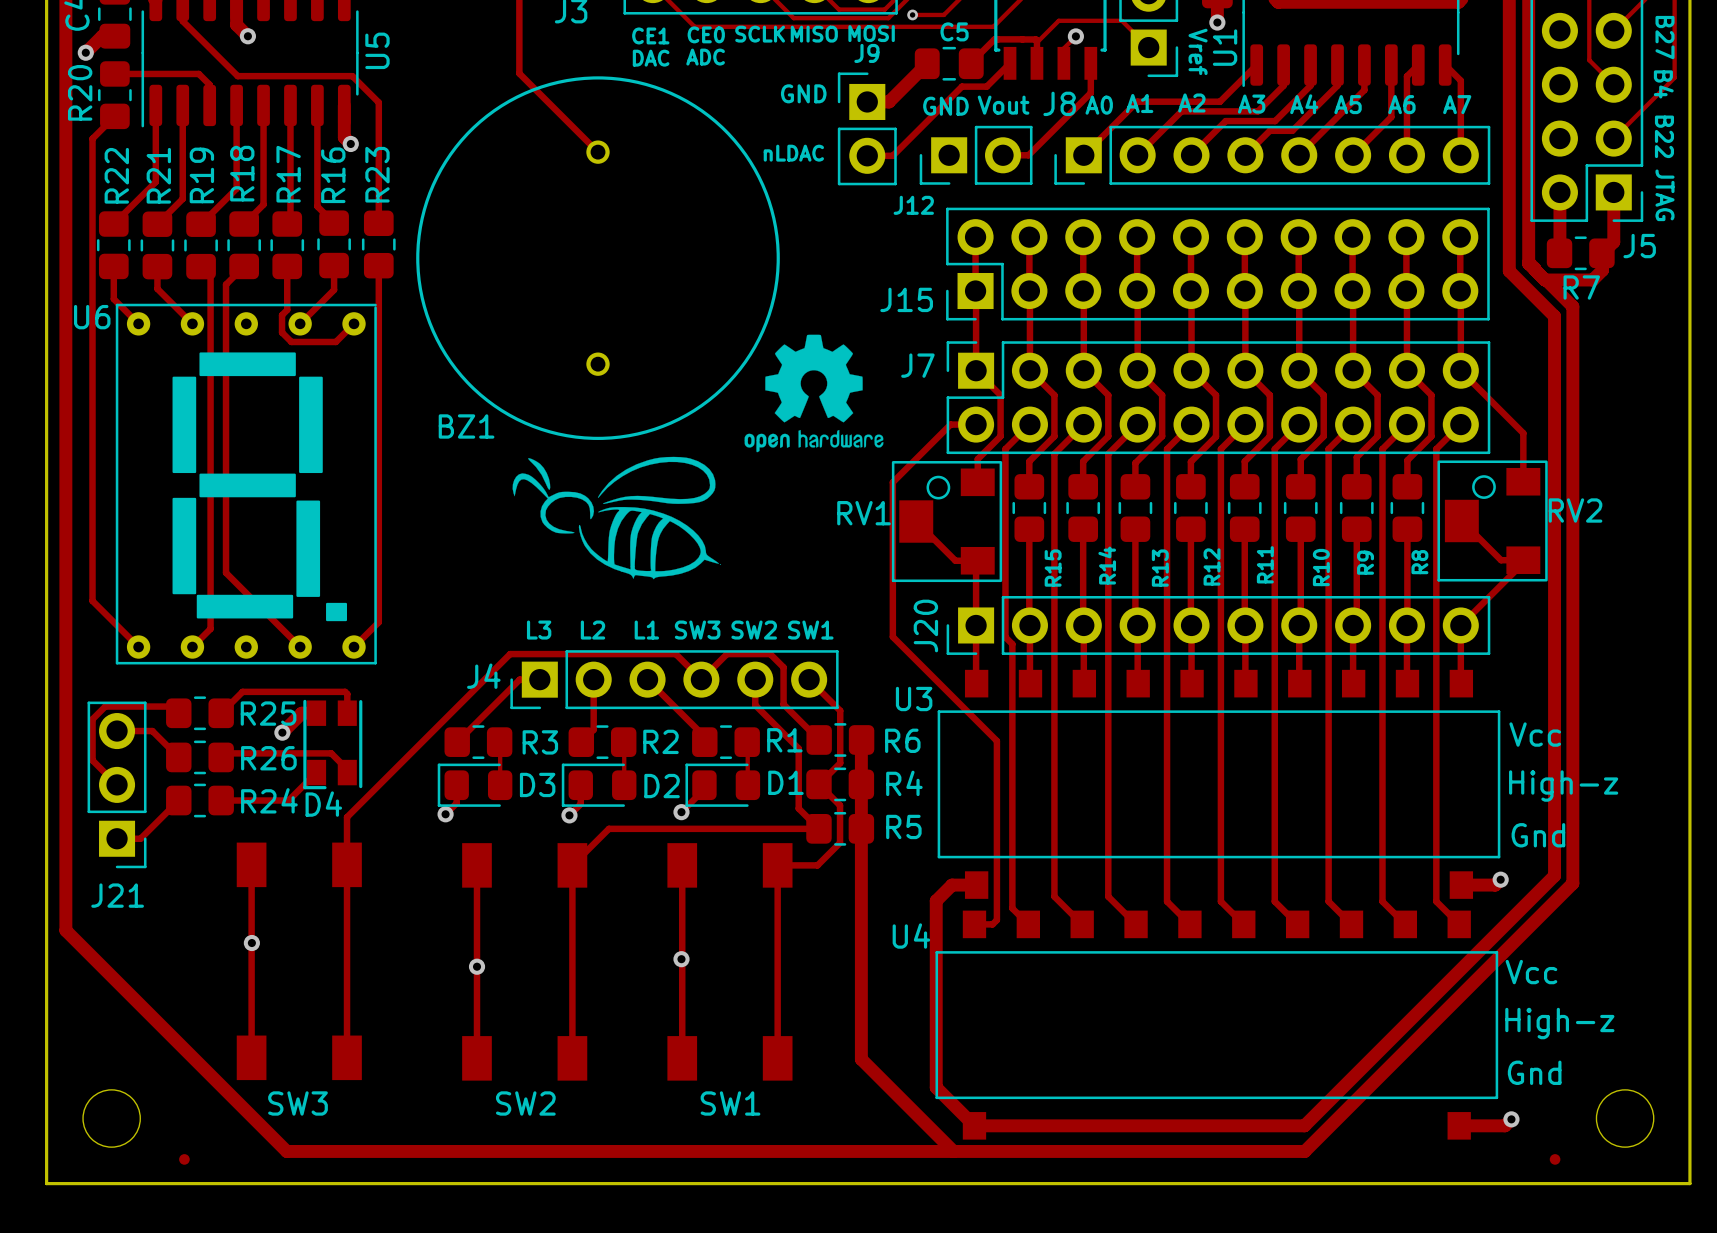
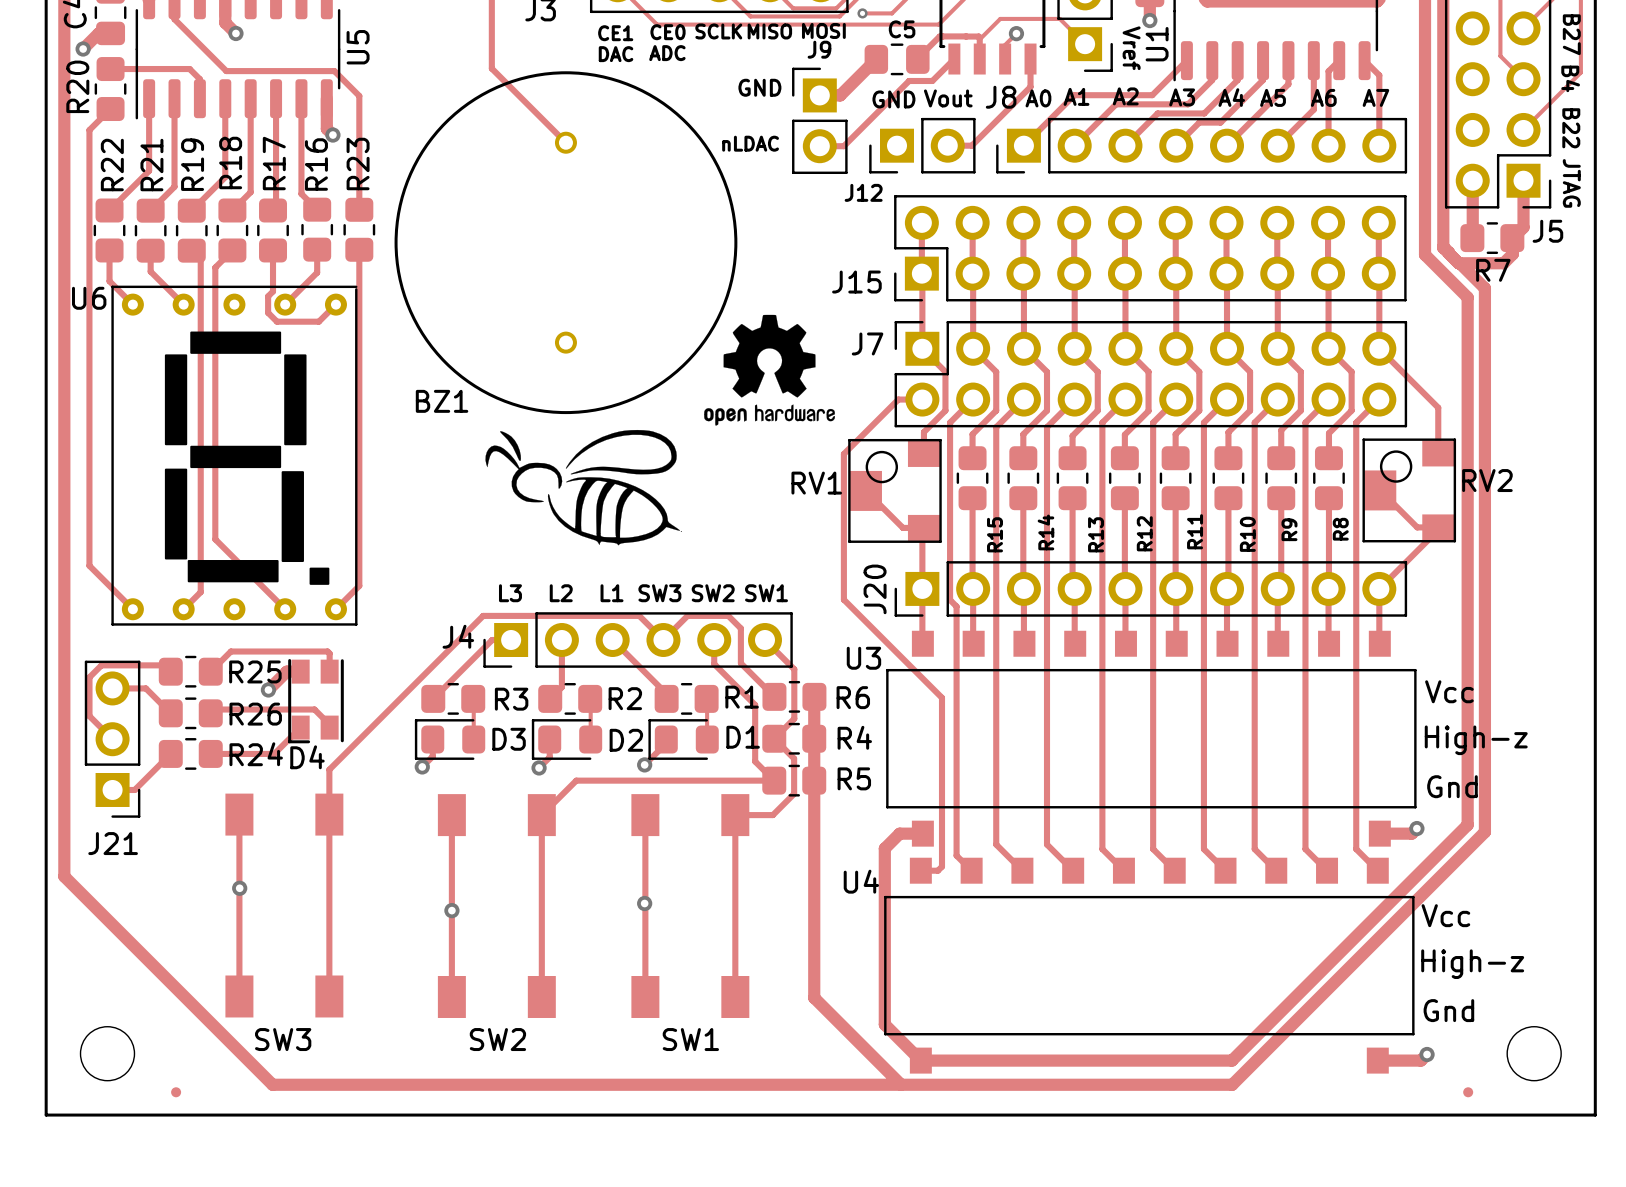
RV2 footprint: [1437, 460, 1548, 582] -> [1362, 438, 1457, 543]
RV1 footprint: [891, 461, 1003, 583] -> [848, 438, 942, 543]

